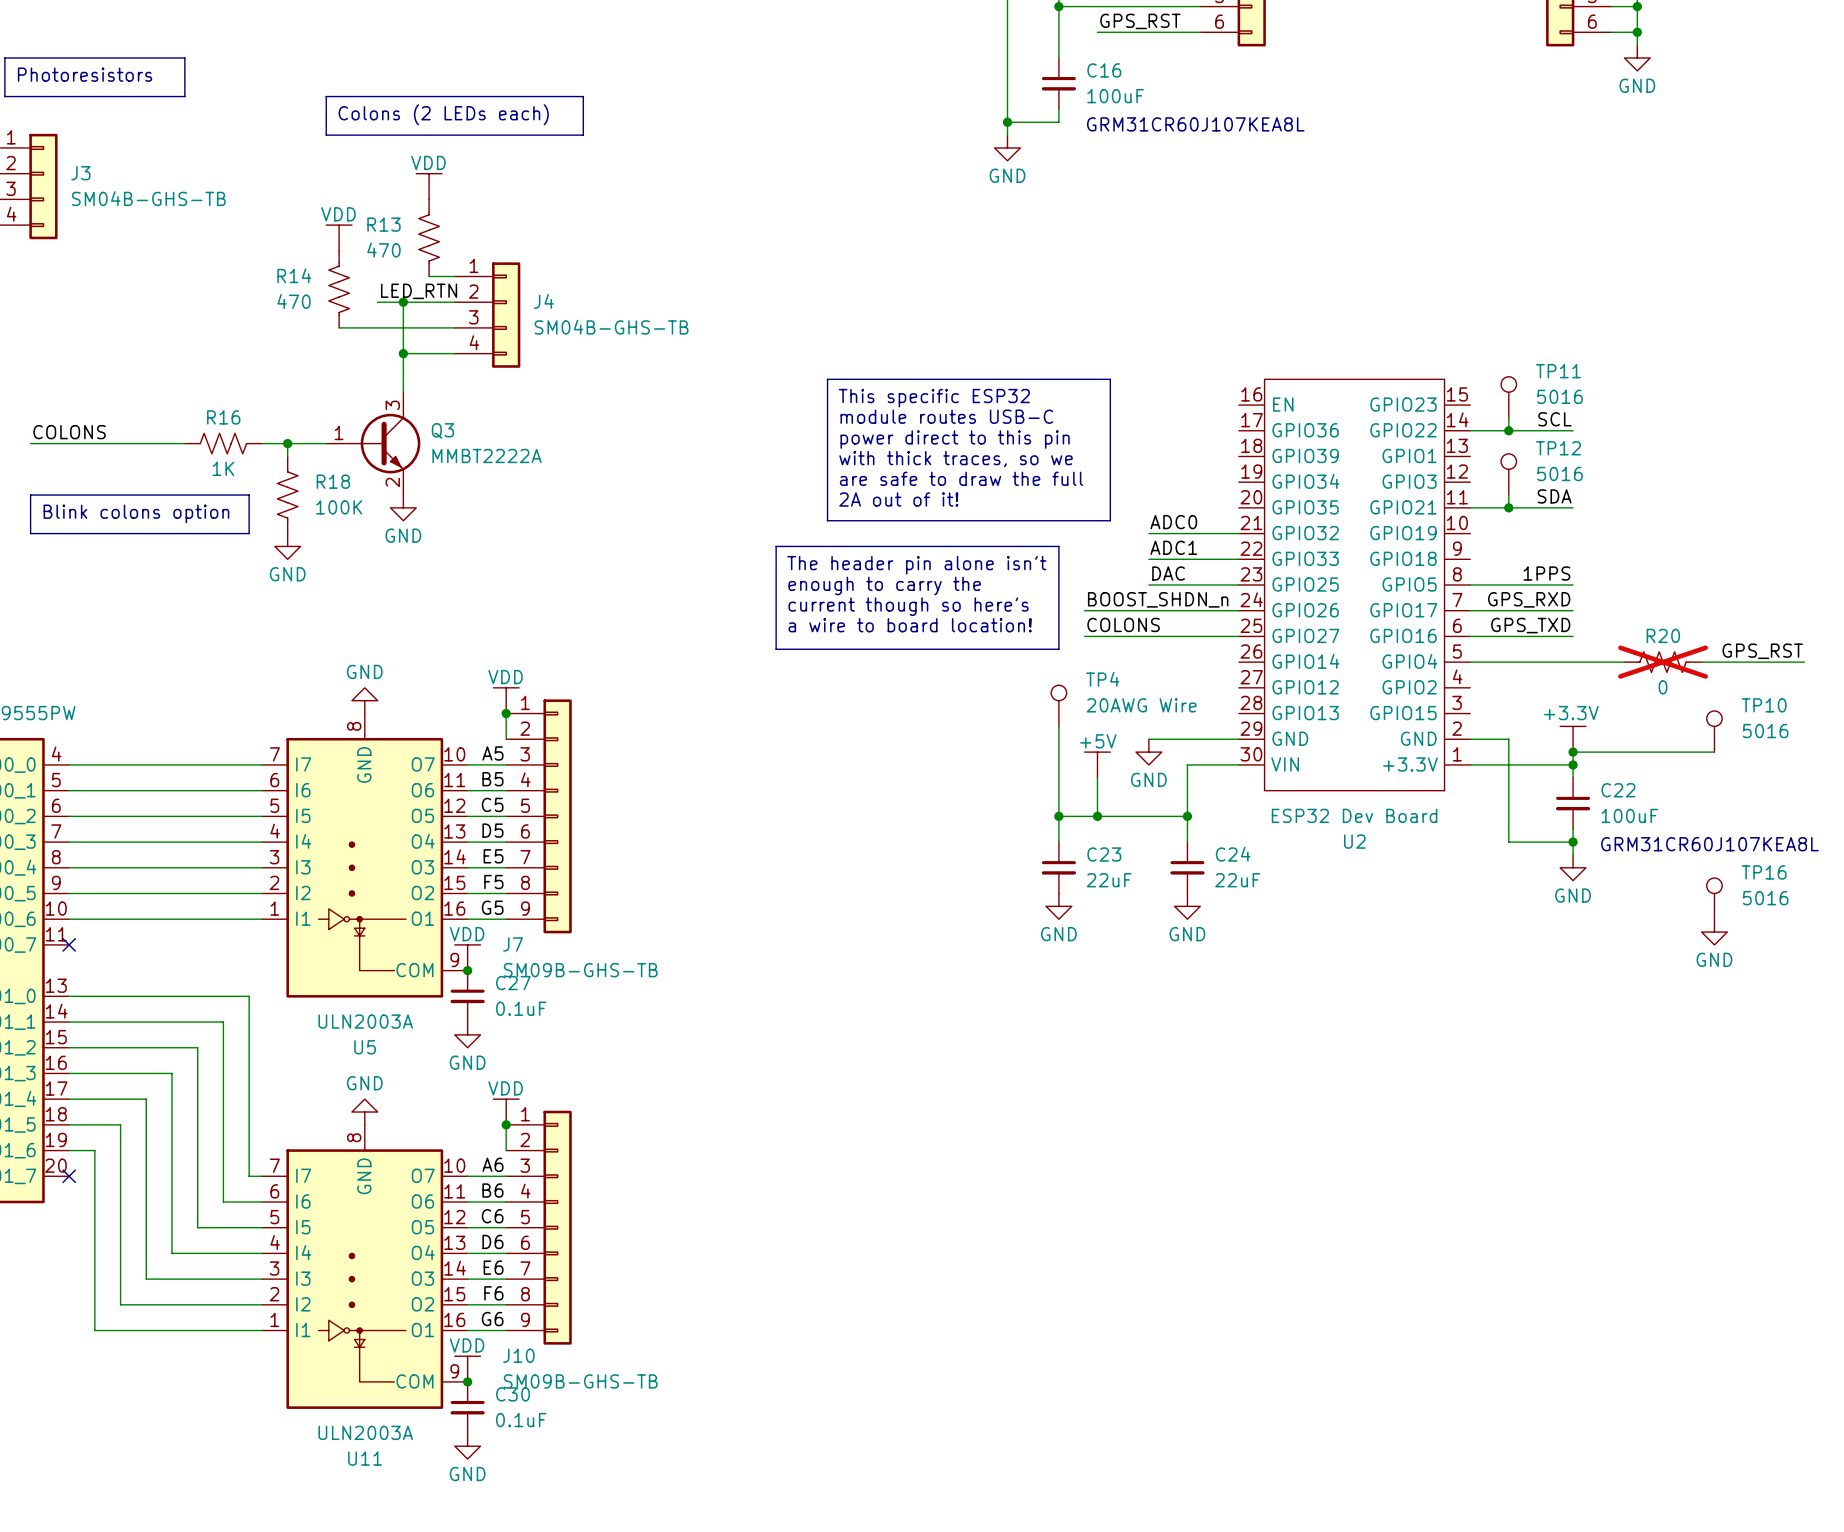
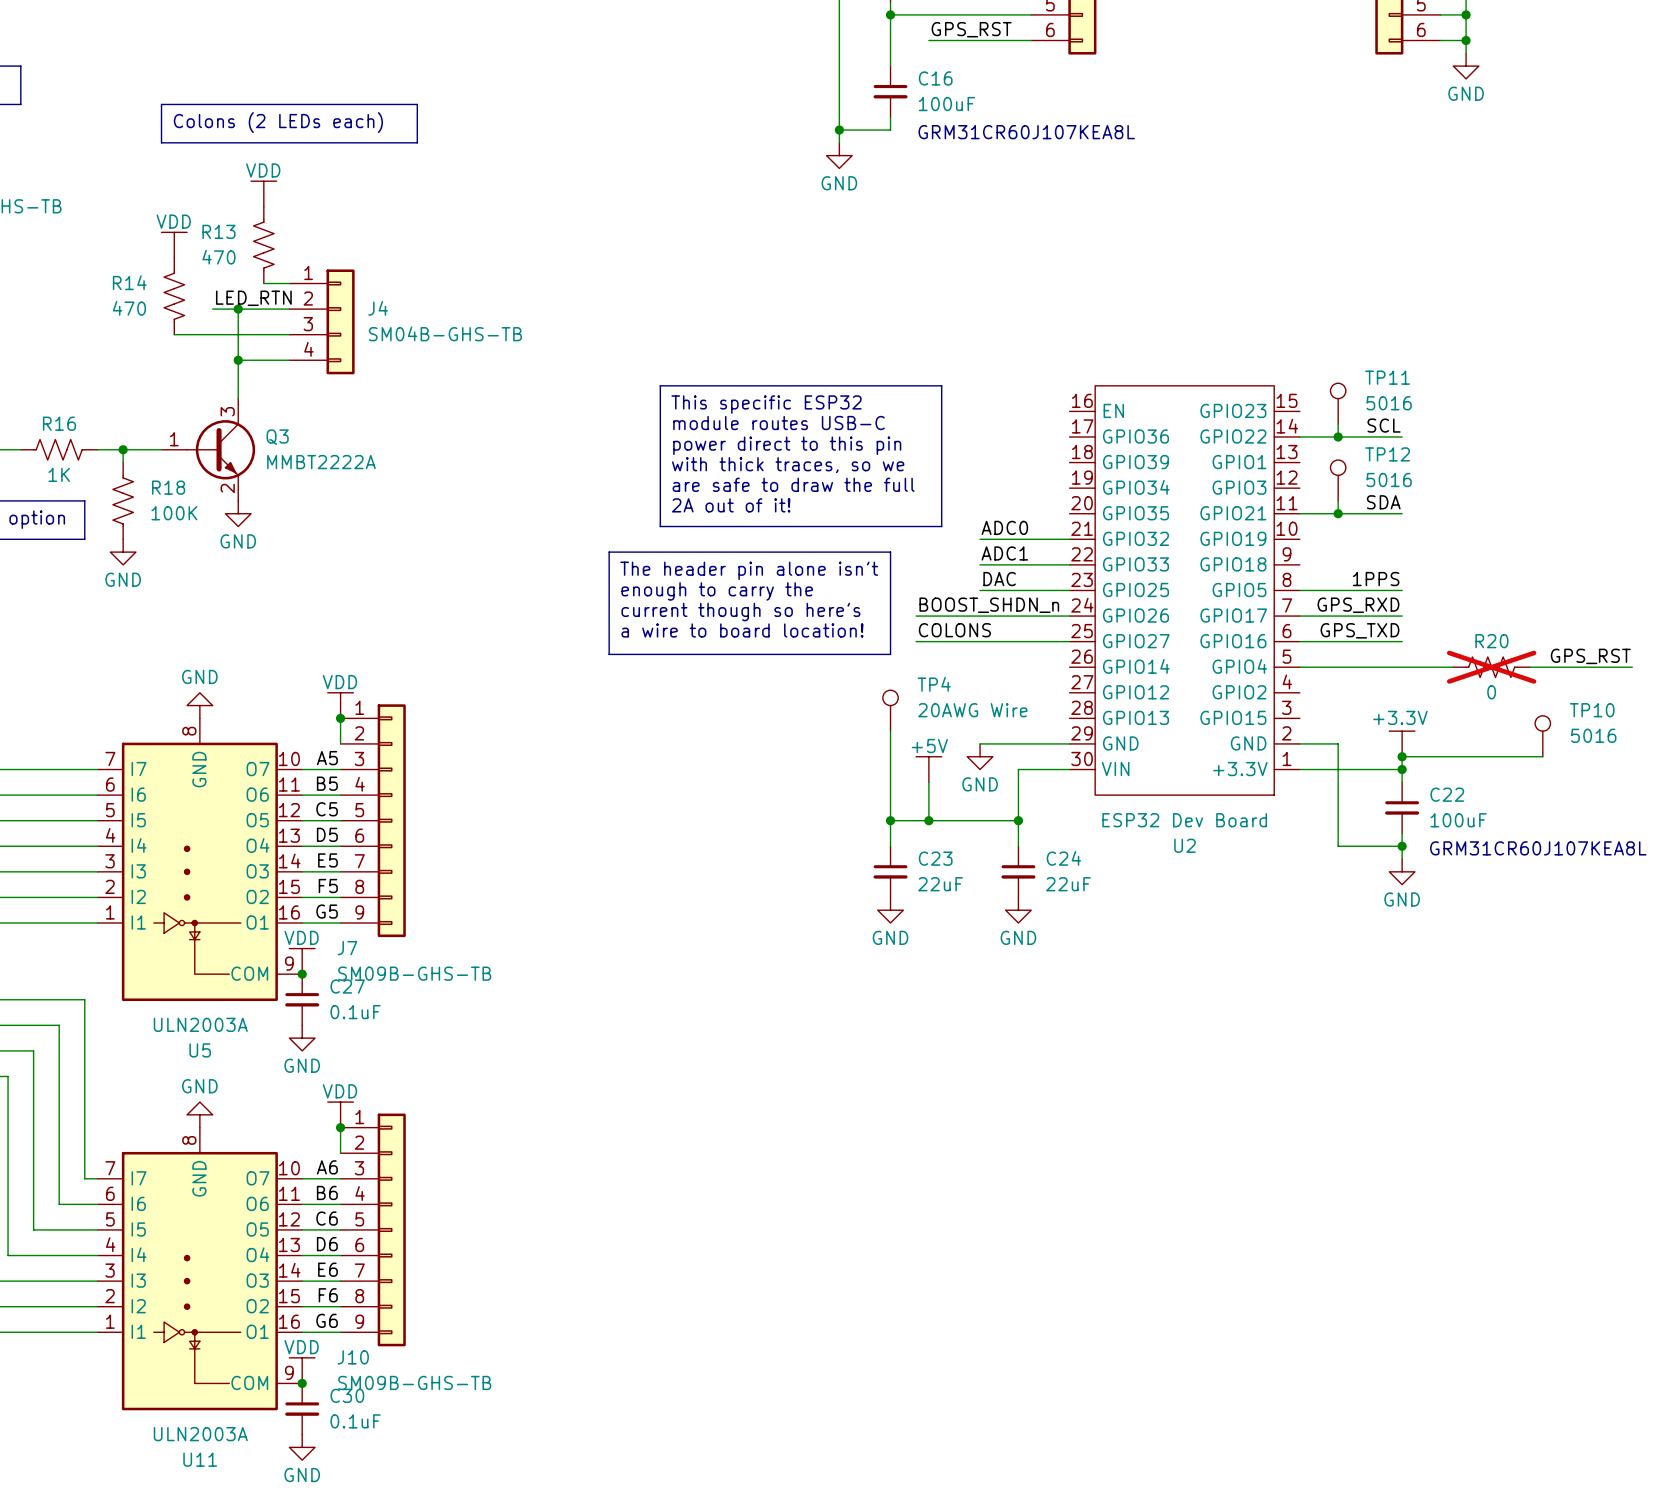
TP16: 5016 (1714, 898) -> none
power symbol: GND (1714, 932) -> none

